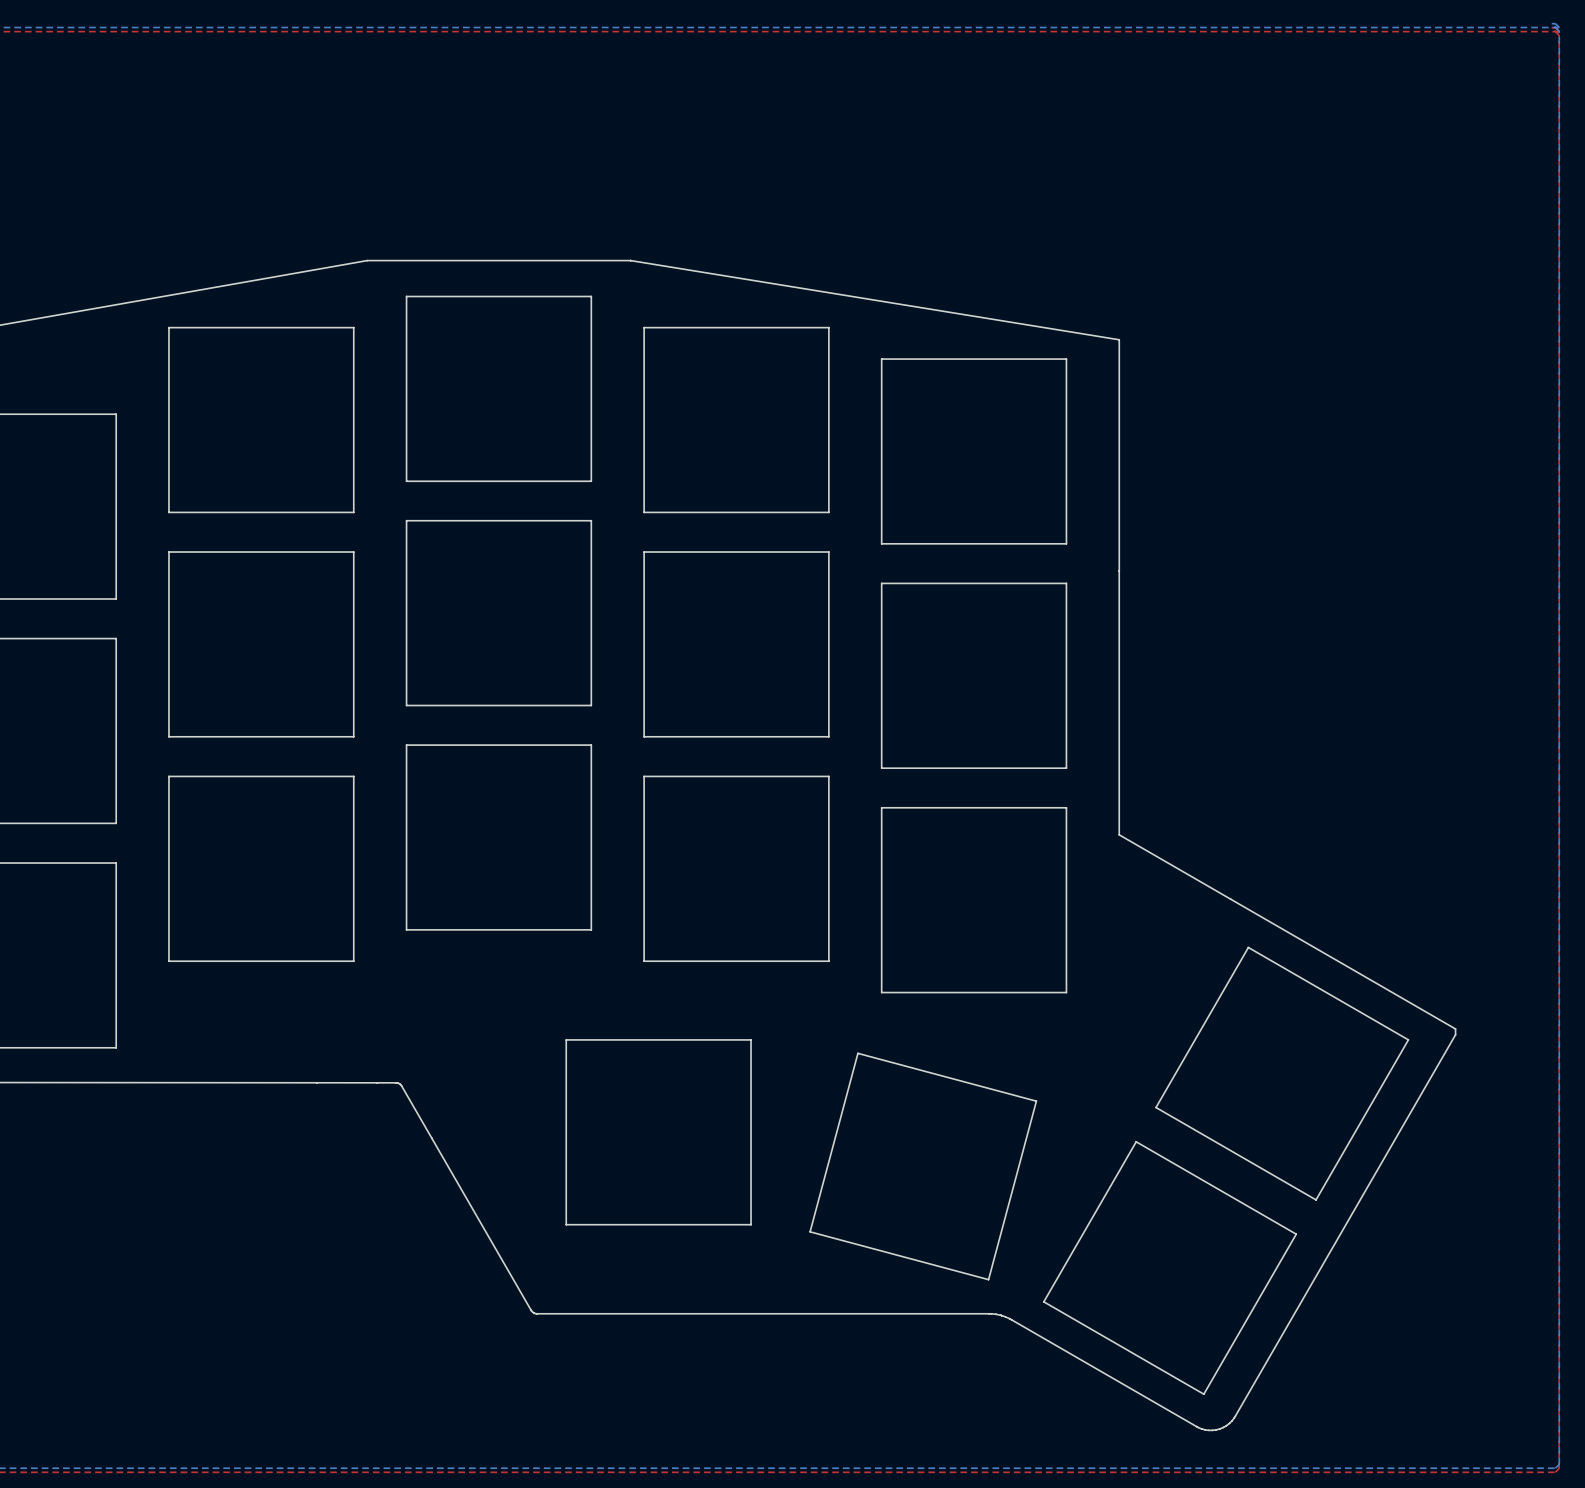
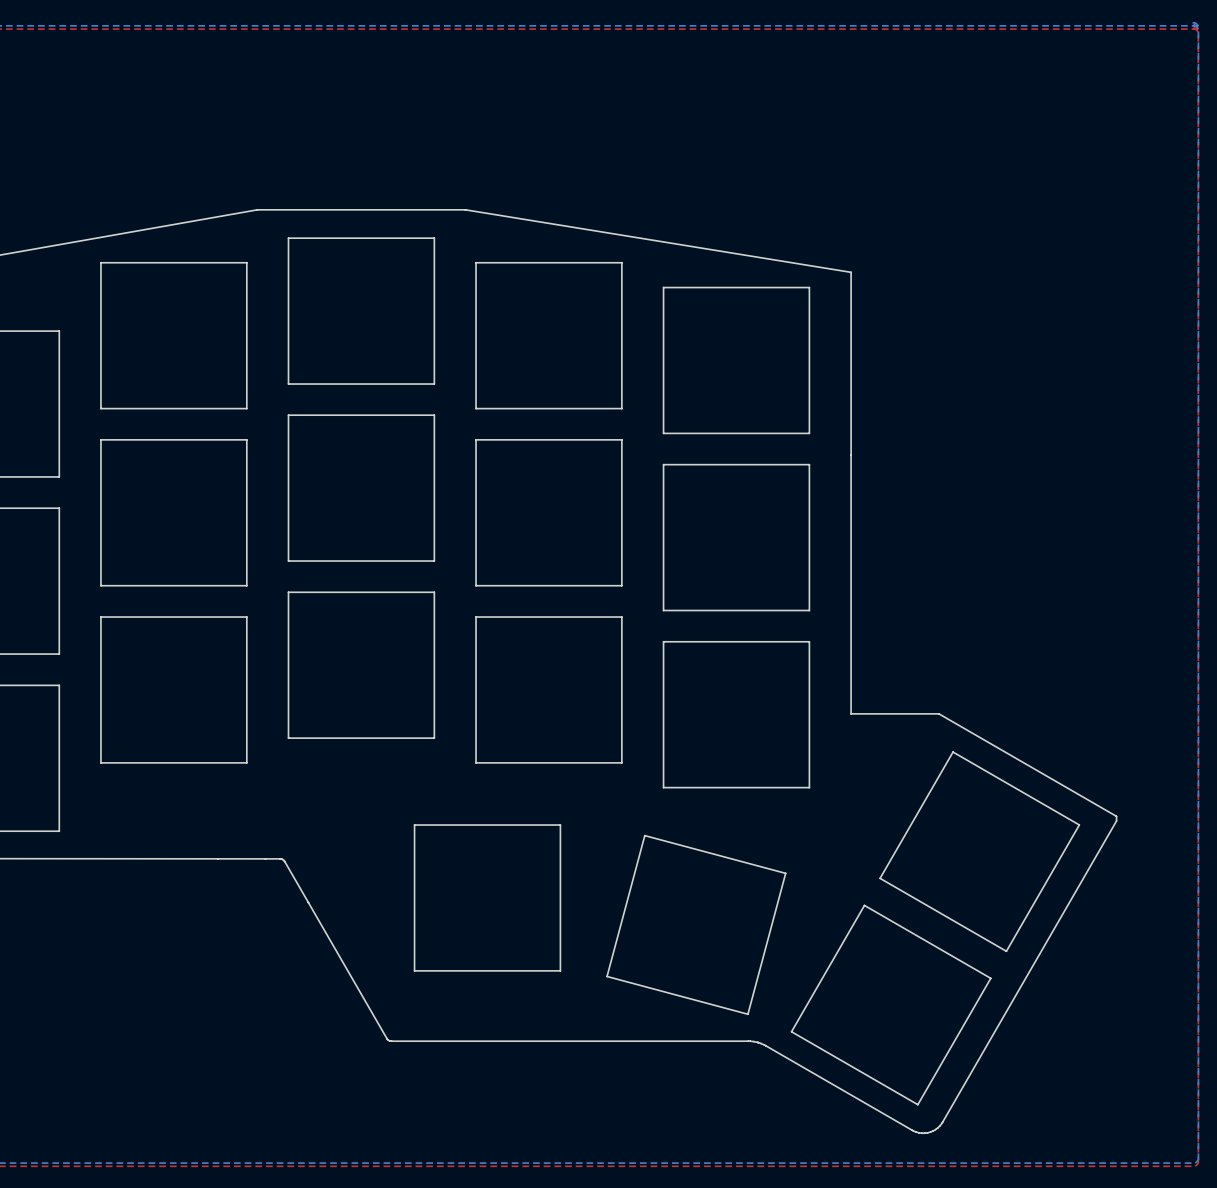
board edge: (1119, 834) (1230, 899) -> (851, 663) (851, 713) (938, 713)

